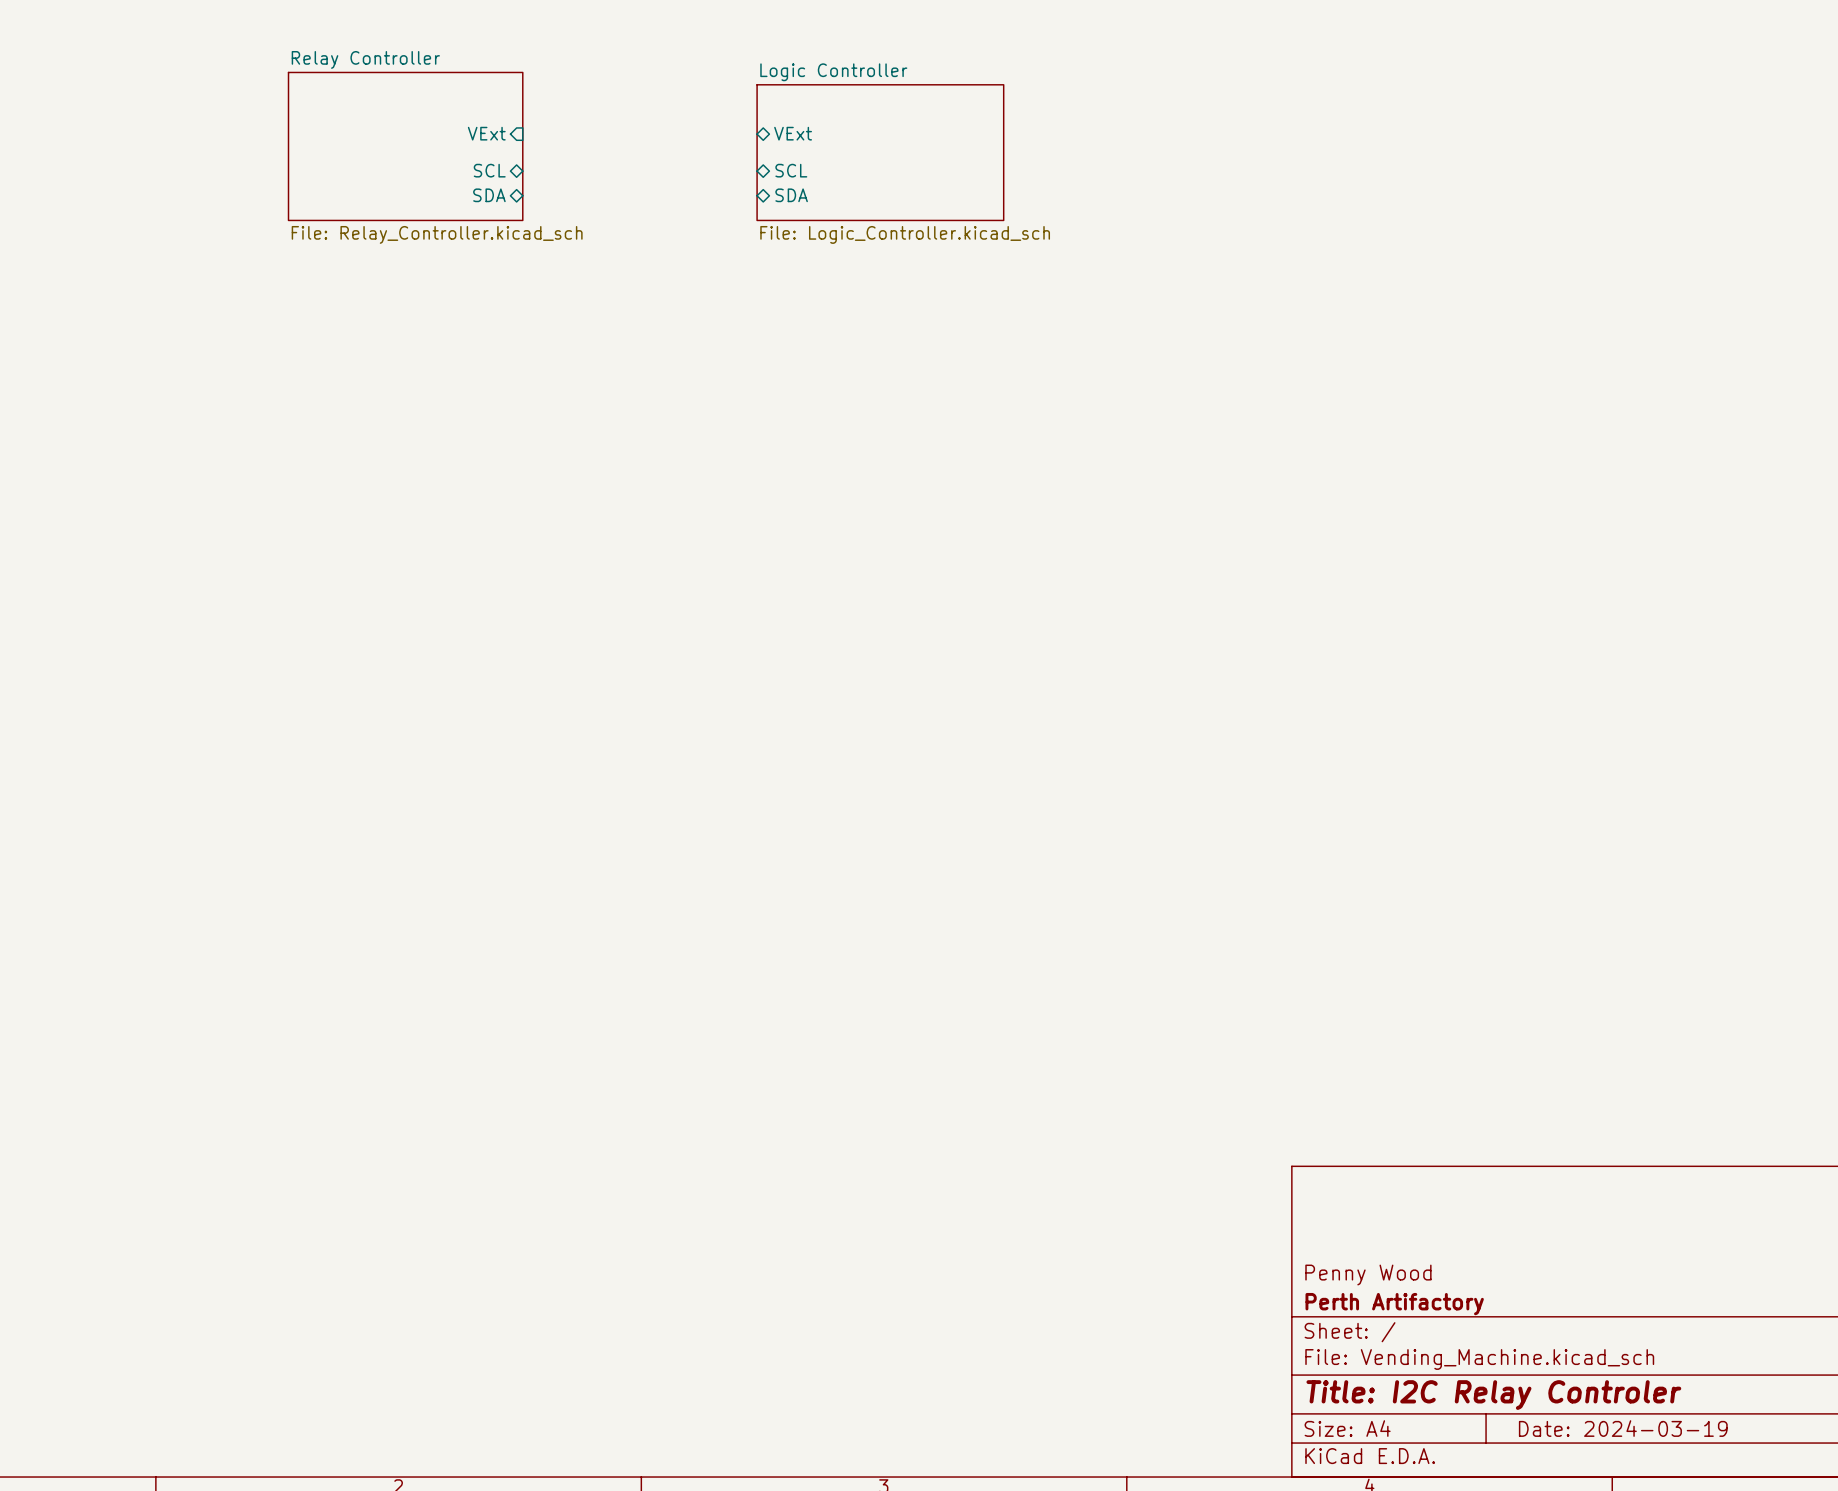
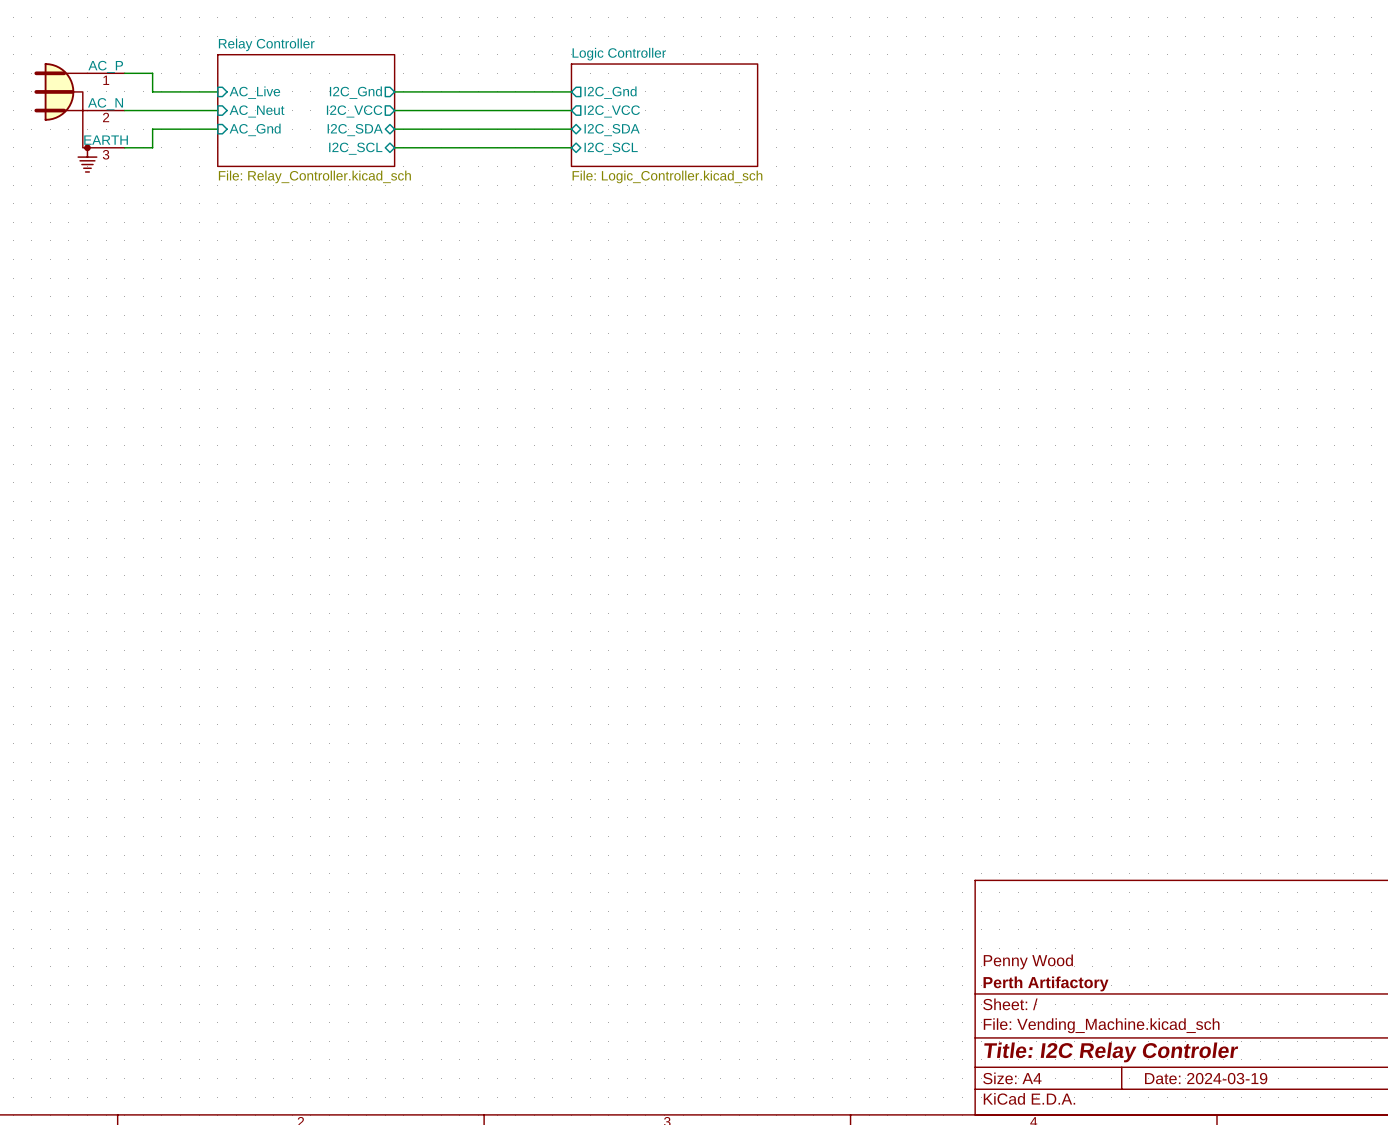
wire: none -> (124, 73) (152, 73) (152, 91) (217, 91)
sheet pin: none -> AC_Live (254, 92)
sheet pin: none -> I2C_Gnd (355, 92)
wire: none -> (394, 91) (571, 91)
sheet pin: none -> I2C_Gnd (610, 92)
sheet pin: VExt (486, 133) -> none
sheet pin: VExt (793, 133) -> none
wire: none -> (124, 110) (217, 110)
sheet pin: none -> AC_Neut (257, 111)
sheet pin: none -> I2C_VCC (354, 111)
wire: none -> (394, 110) (571, 110)
sheet pin: none -> I2C_VCC (612, 111)
part: none -> (79, 117)
sheet pin: SCL (489, 170) -> I2C_SDA (355, 130)
sheet pin: SCL (791, 170) -> I2C_SDA (612, 130)
wire: none -> (217, 129) (152, 129) (152, 147) (124, 147)
sheet pin: none -> AC_Gnd (255, 129)
wire: none -> (394, 129) (571, 129)
sheet pin: SDA (489, 195) -> I2C_SCL (355, 148)
wire: none -> (394, 147) (571, 147)
sheet pin: SDA (791, 195) -> I2C_SCL (611, 148)

